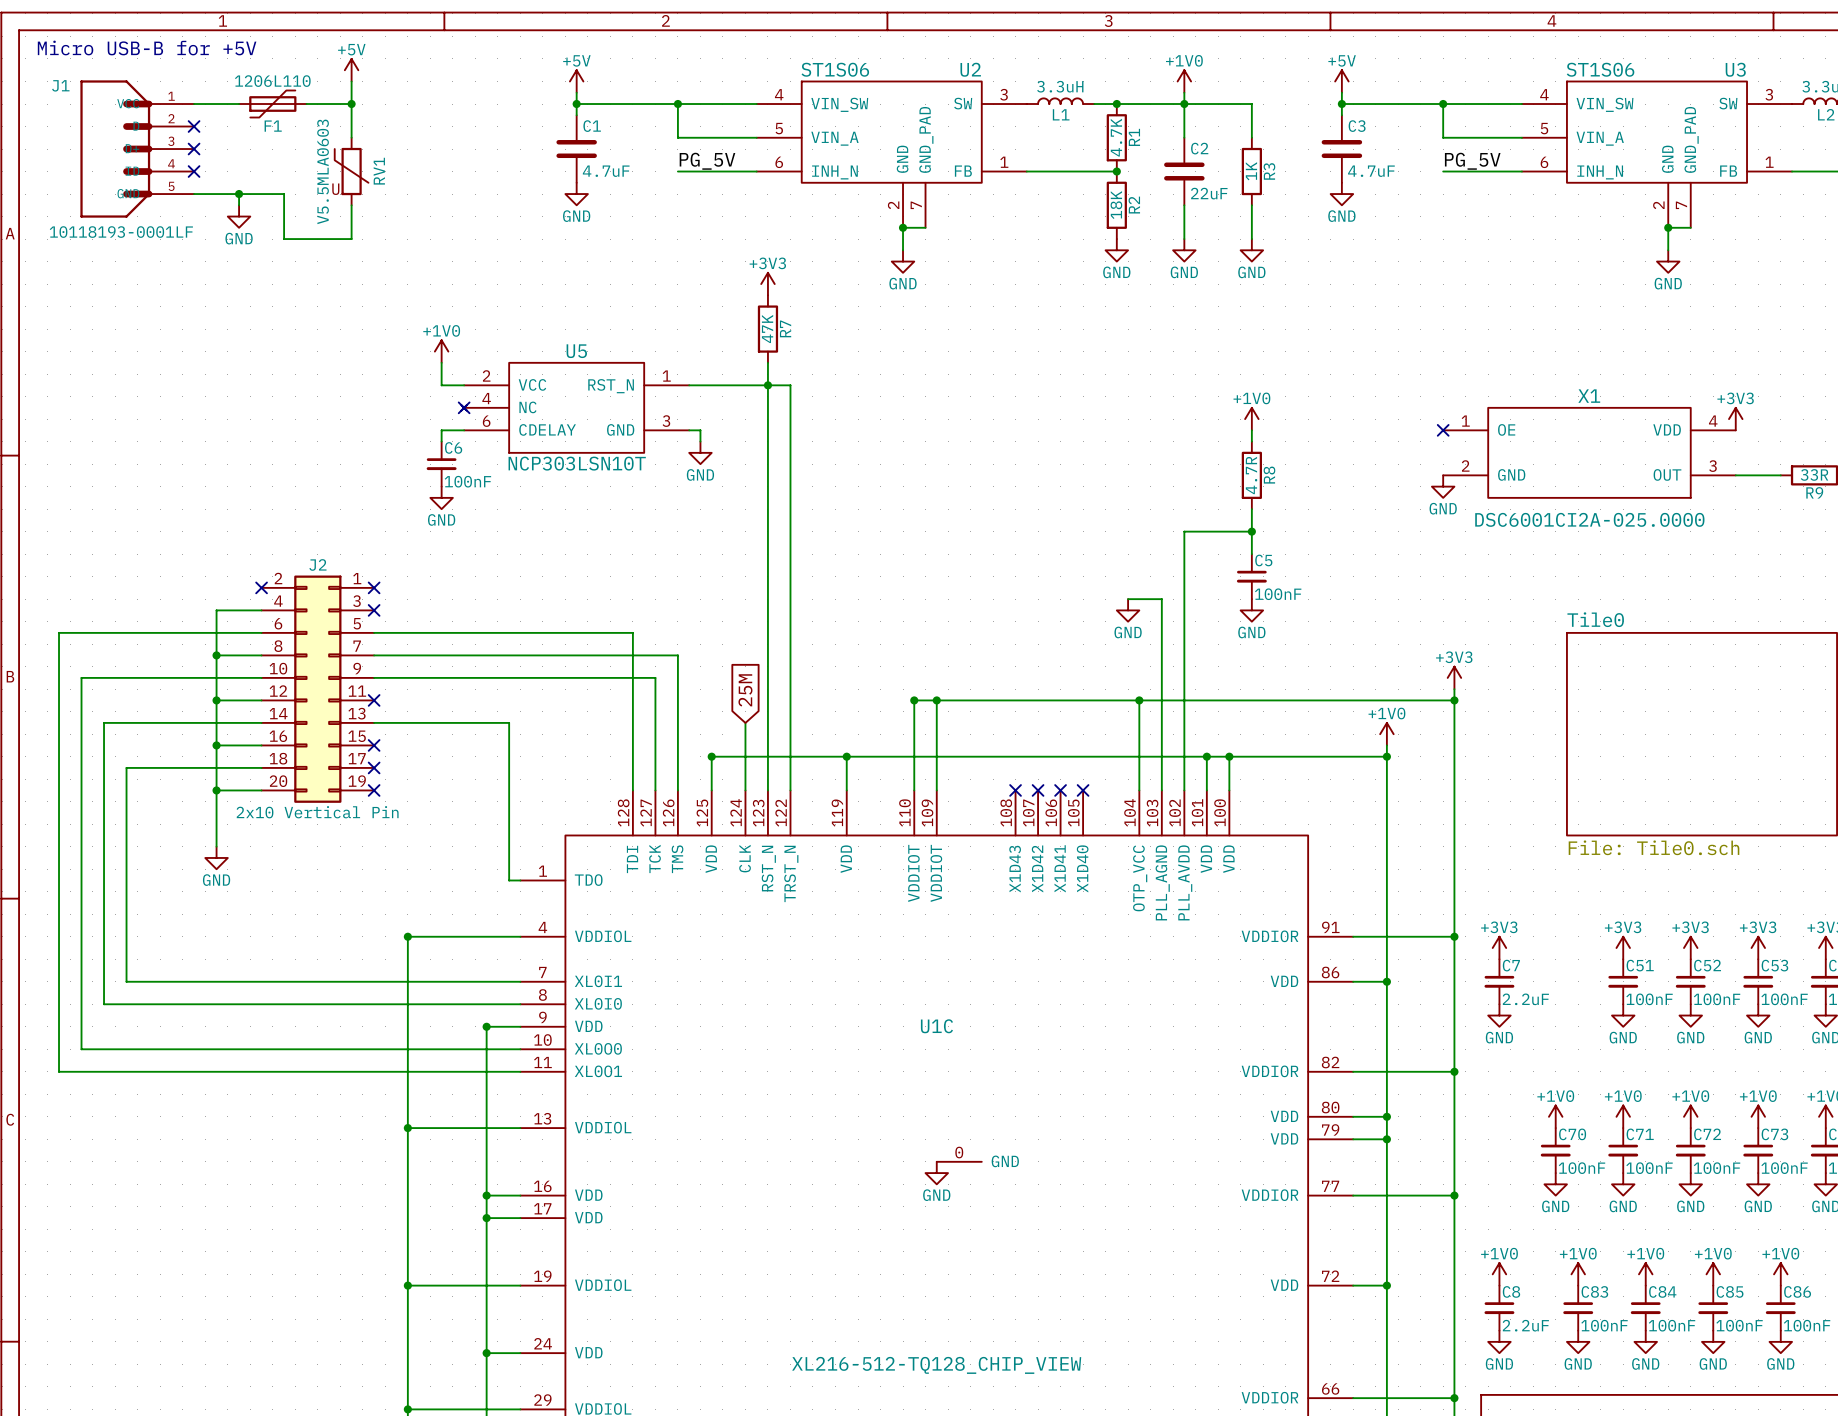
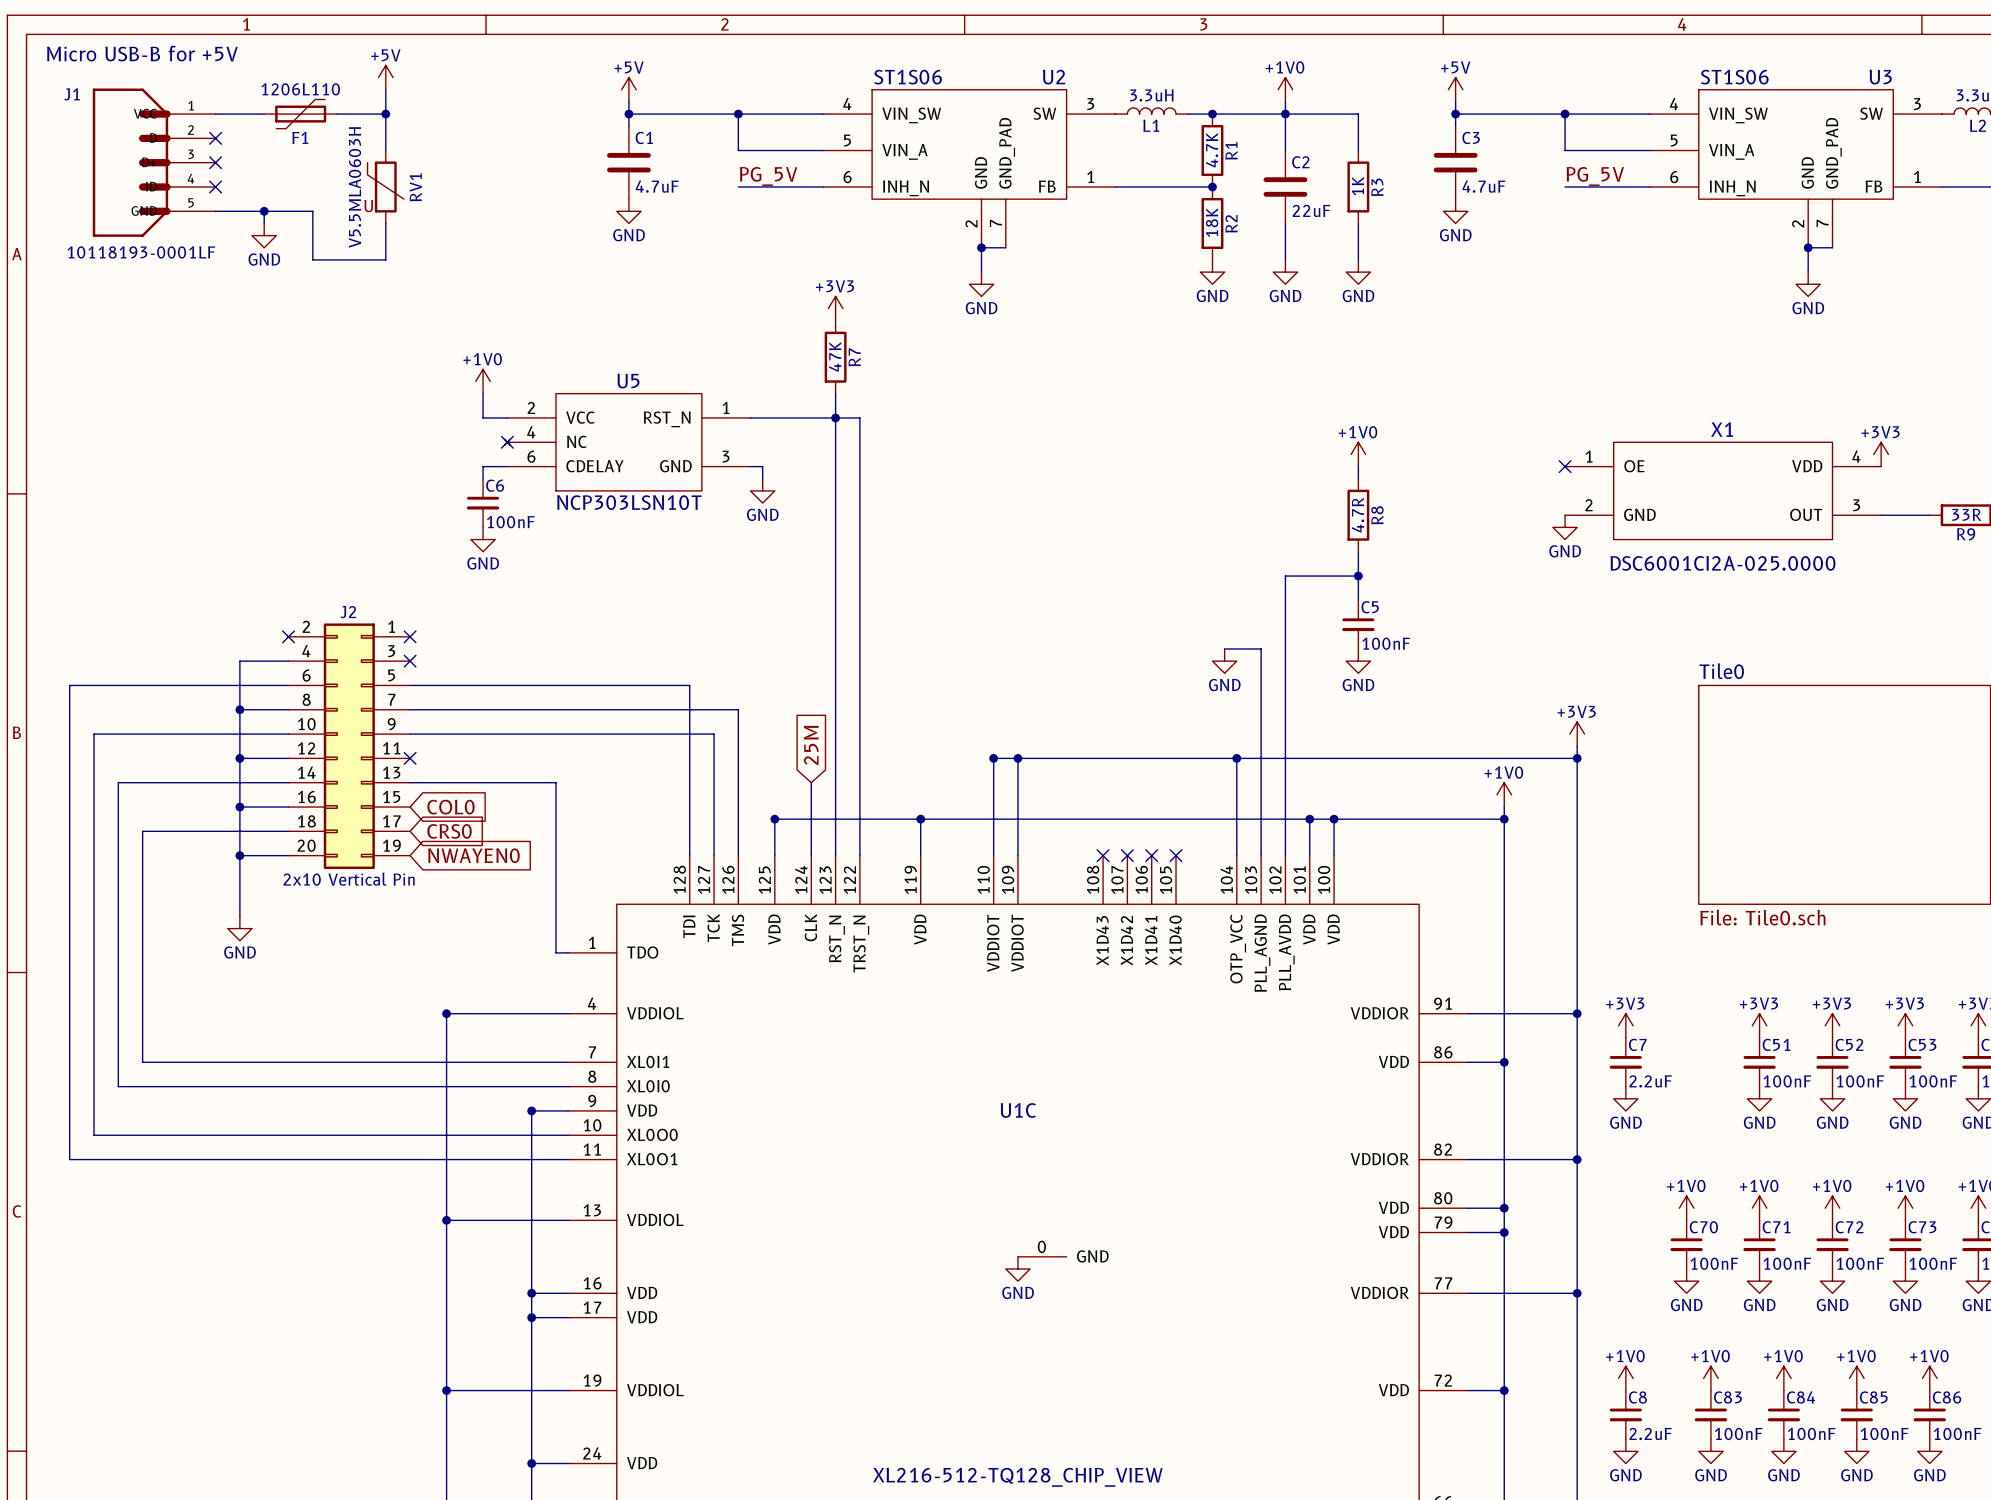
RV1 value: V5.5MLA0603 (323, 171) -> V5.5MLA0603H (355, 187)
no-connect mark: (374, 745) -> none
global label: none -> COL0 (450, 807)
no-connect mark: (374, 767) -> none
global label: none -> CRS0 (449, 831)
no-connect mark: (374, 790) -> none
global label: none -> NWAYEN0 (473, 855)

